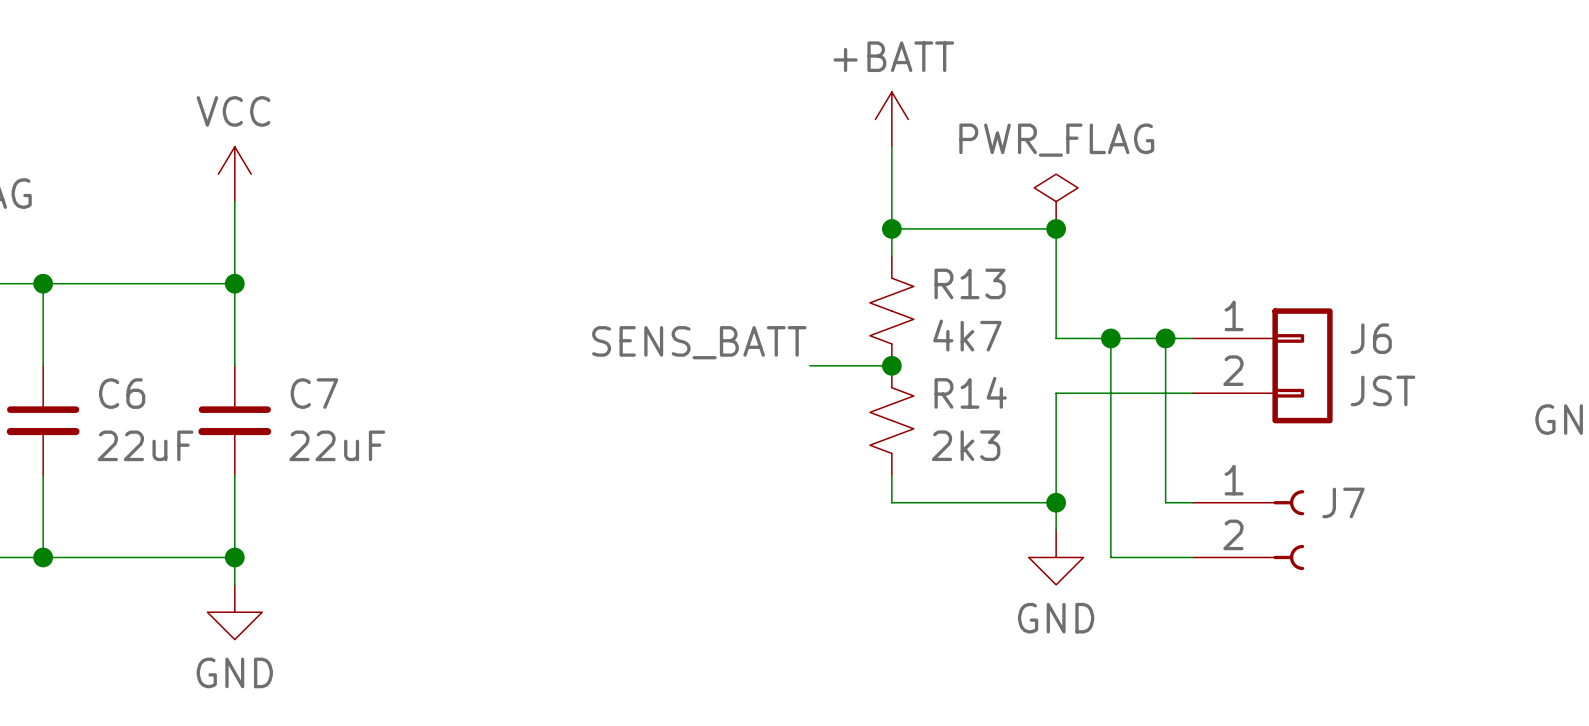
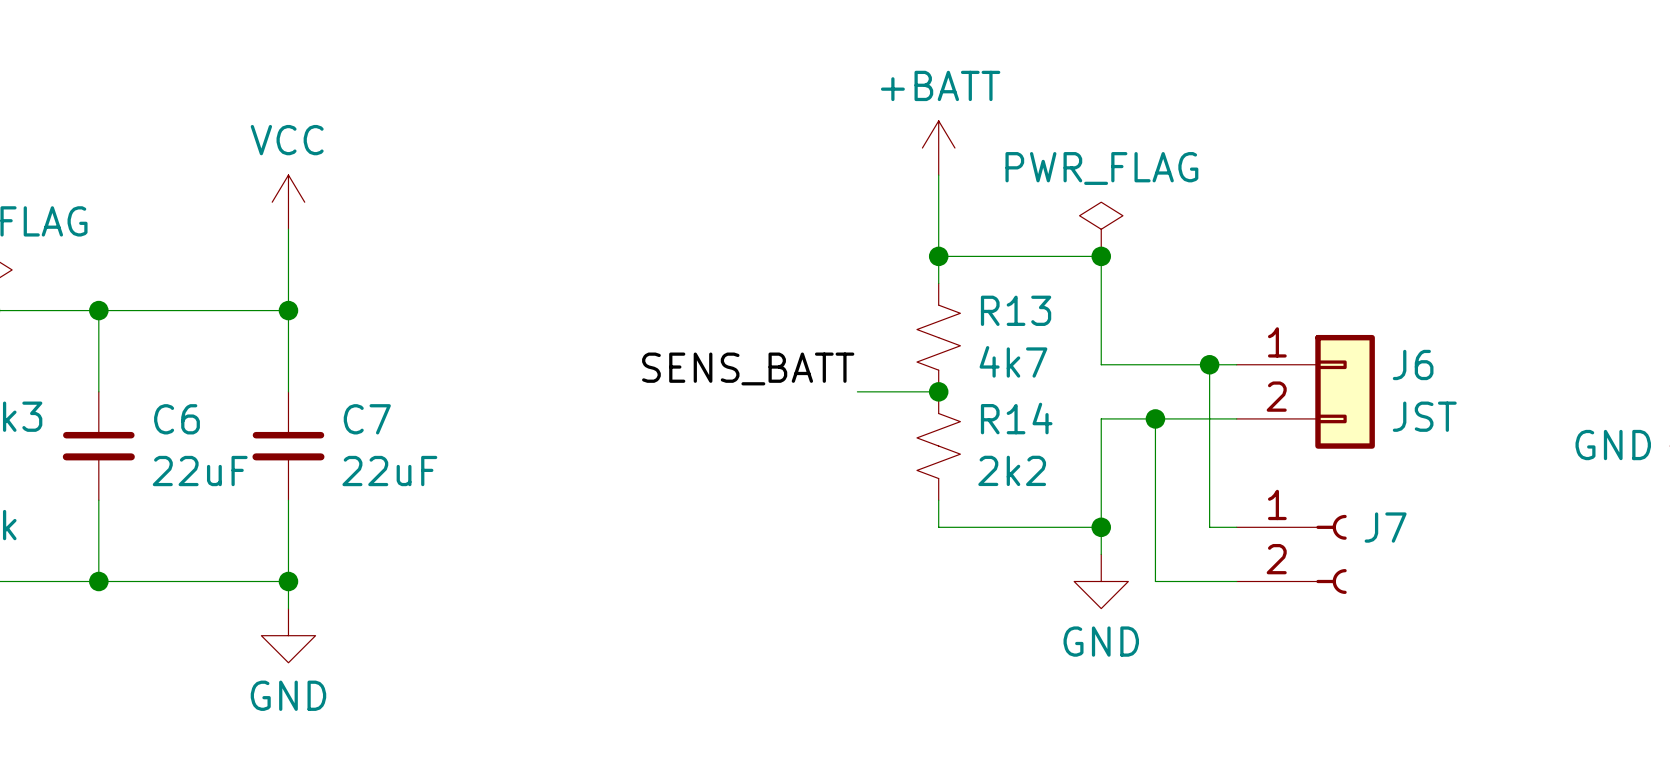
wire: (1110, 338) (1110, 393) -> none
junction position: (1110, 338) -> (1155, 418)
R14 value: 2k3 (966, 445) -> 2k2 (1012, 470)

